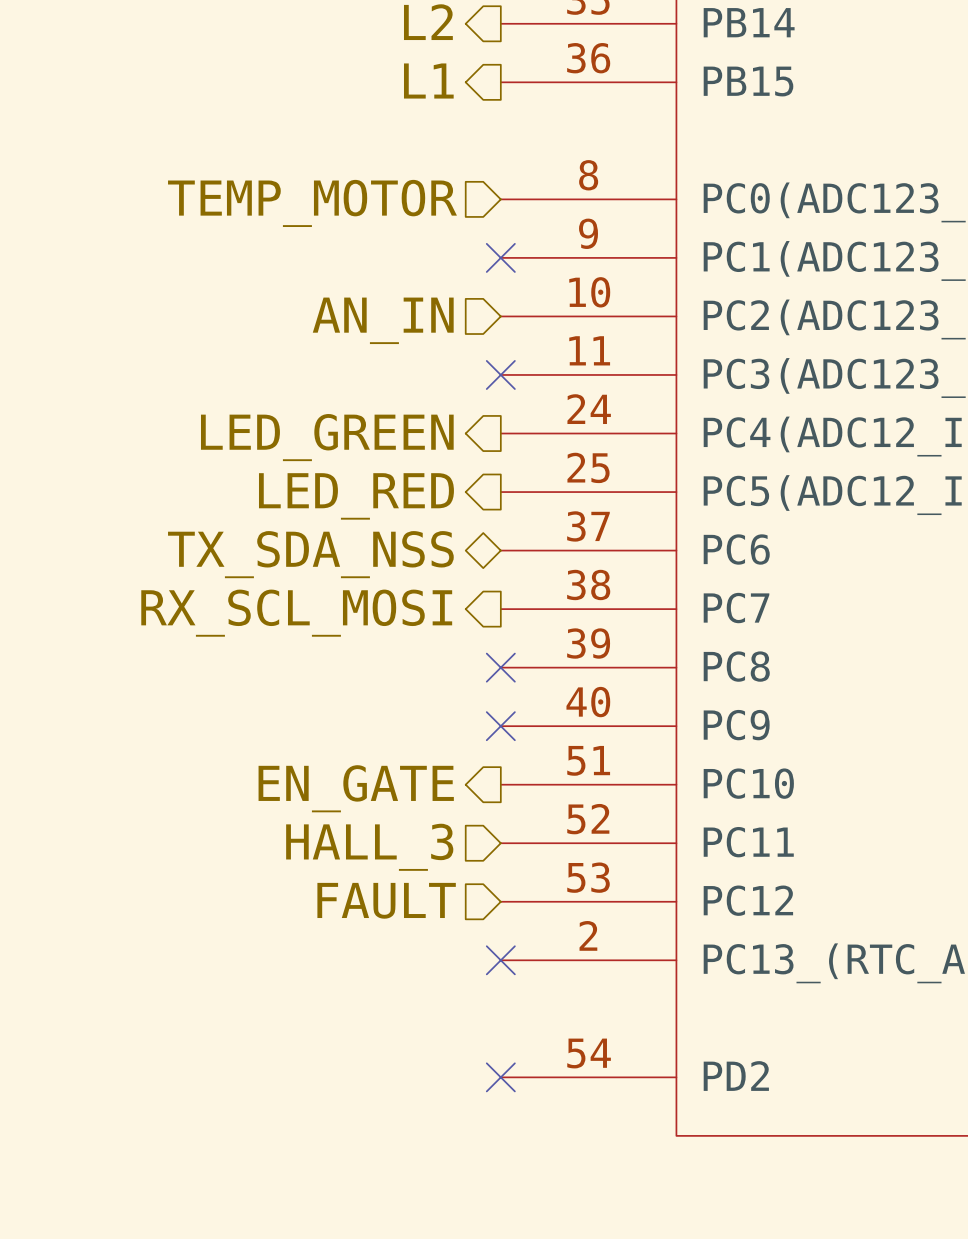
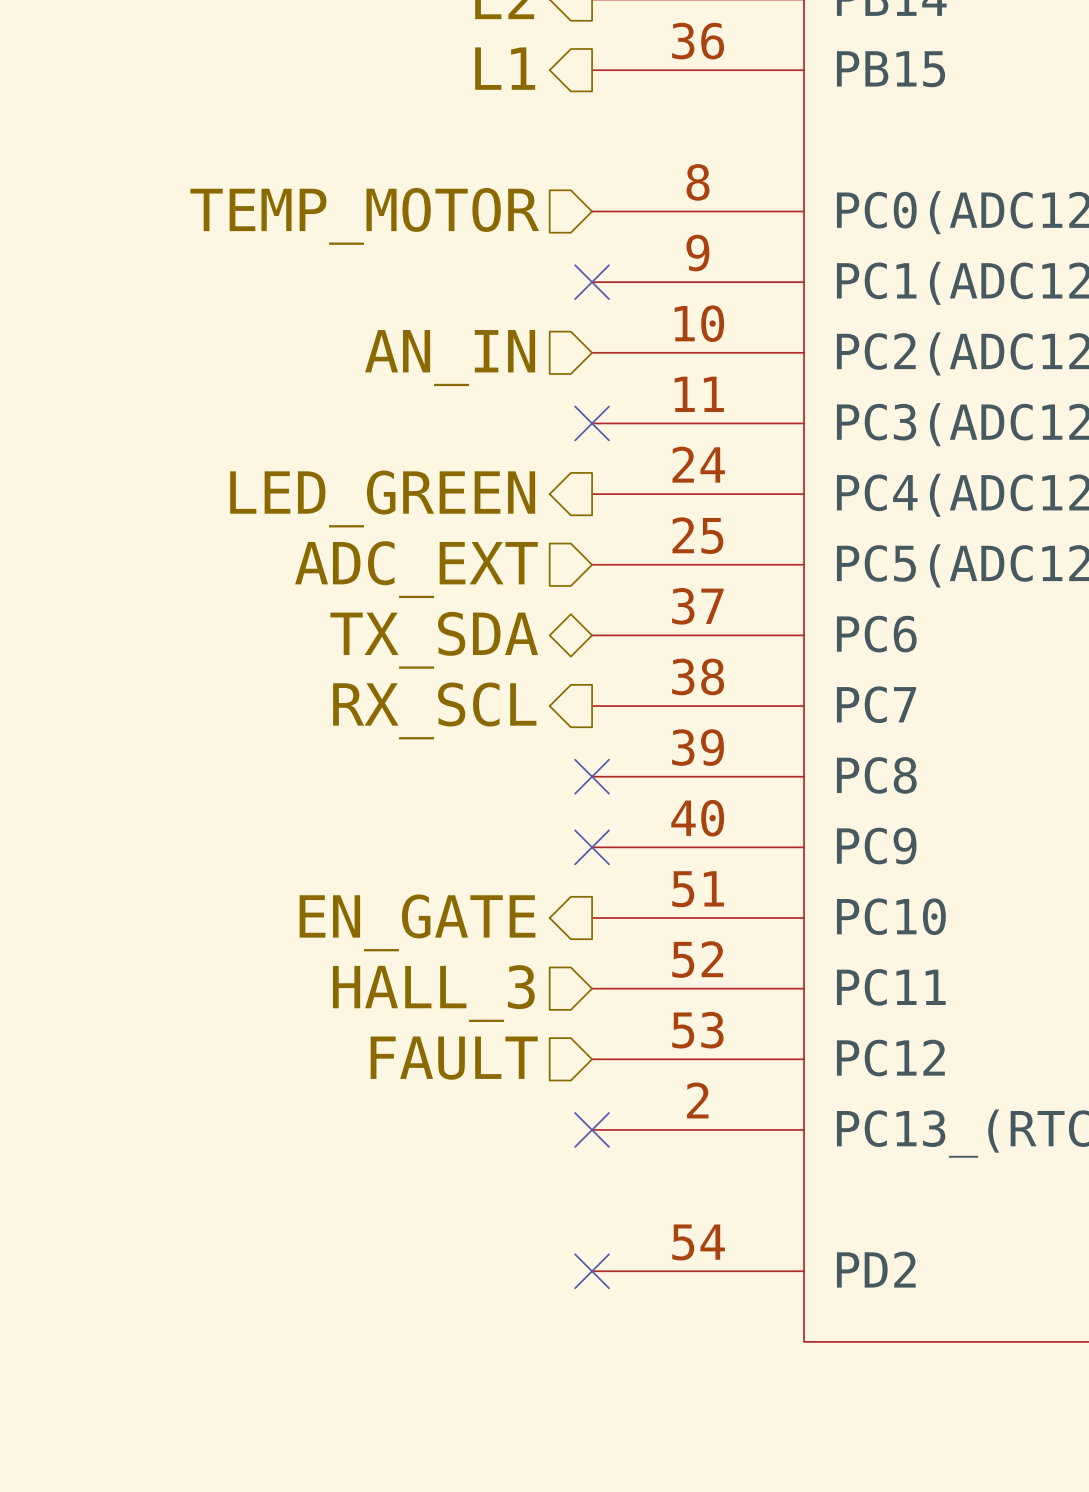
hierarchical label shape: output (356, 496) -> input (416, 569)
hierarchical label: LED_RED (356, 496) -> ADC_EXT (416, 569)
hierarchical label: TX_SDA_NSS (310, 554) -> TX_SDA (434, 640)
hierarchical label: RX_SCL_MOSI (296, 613) -> RX_SCL (434, 710)

